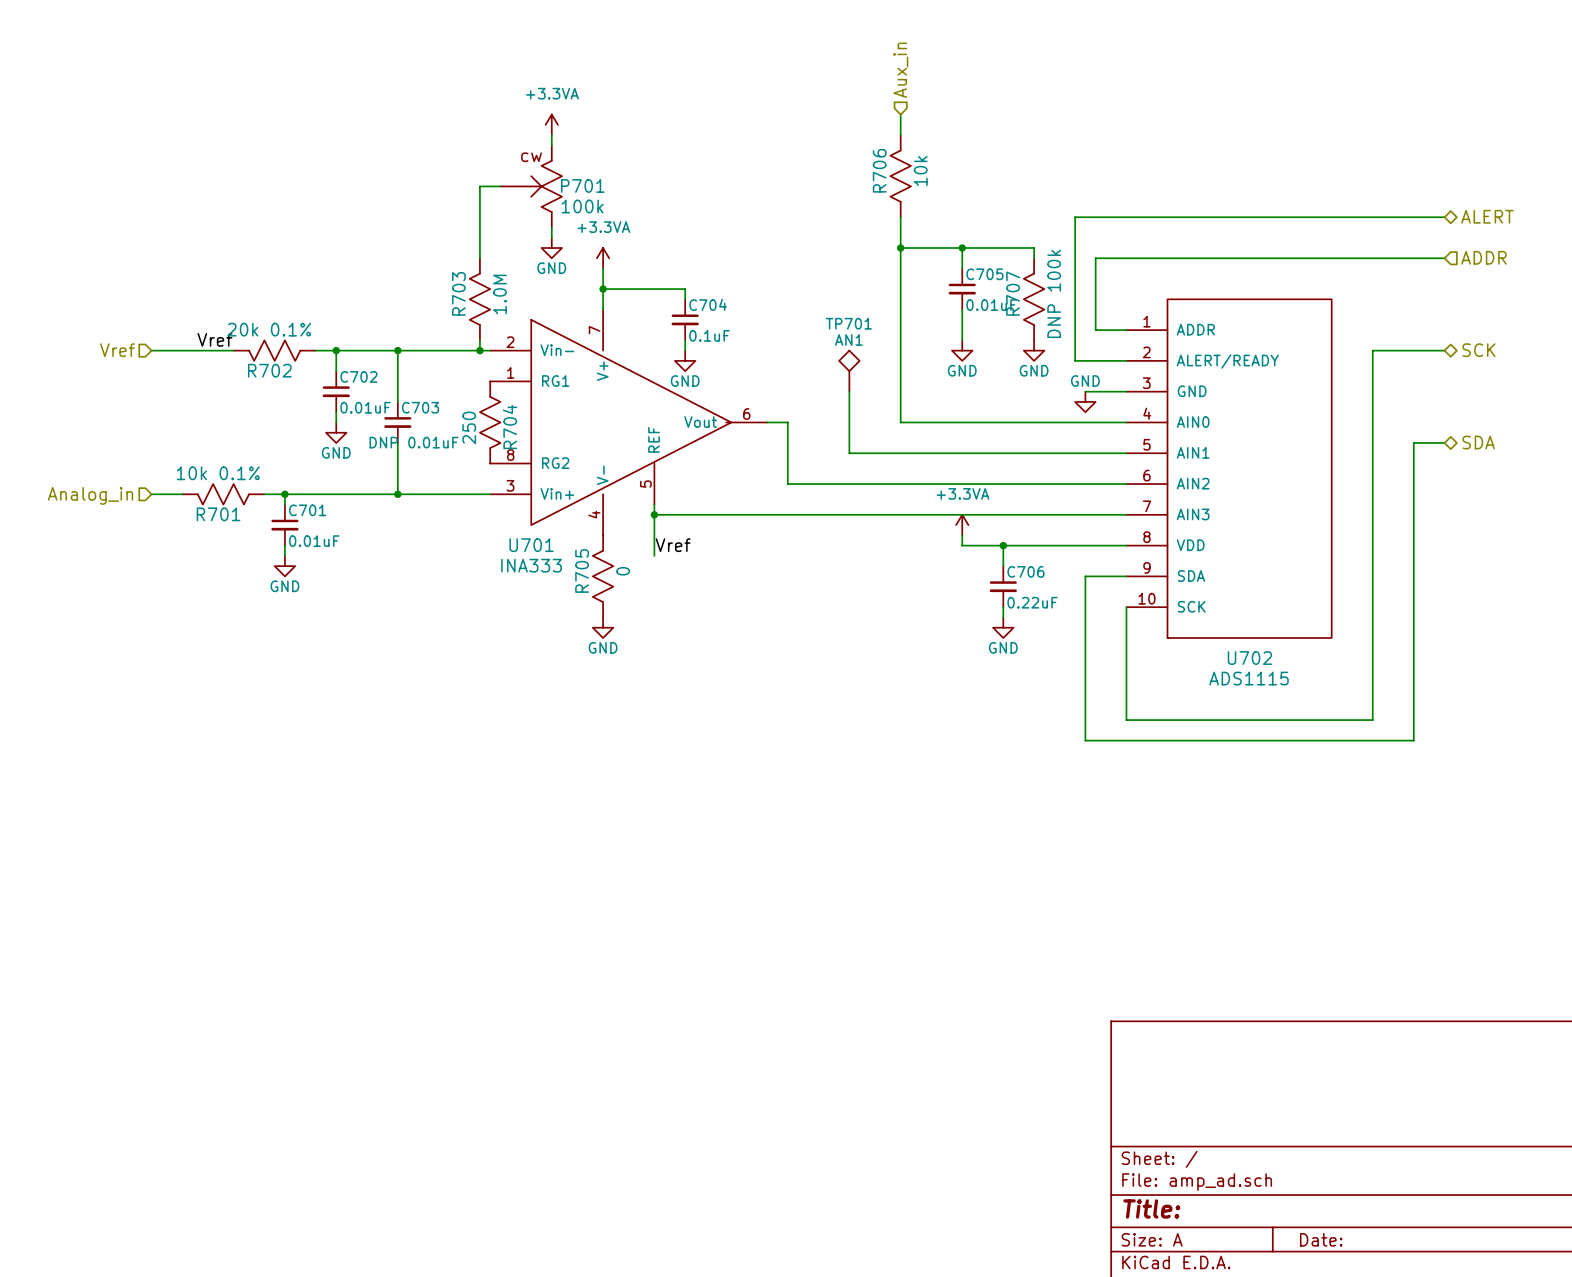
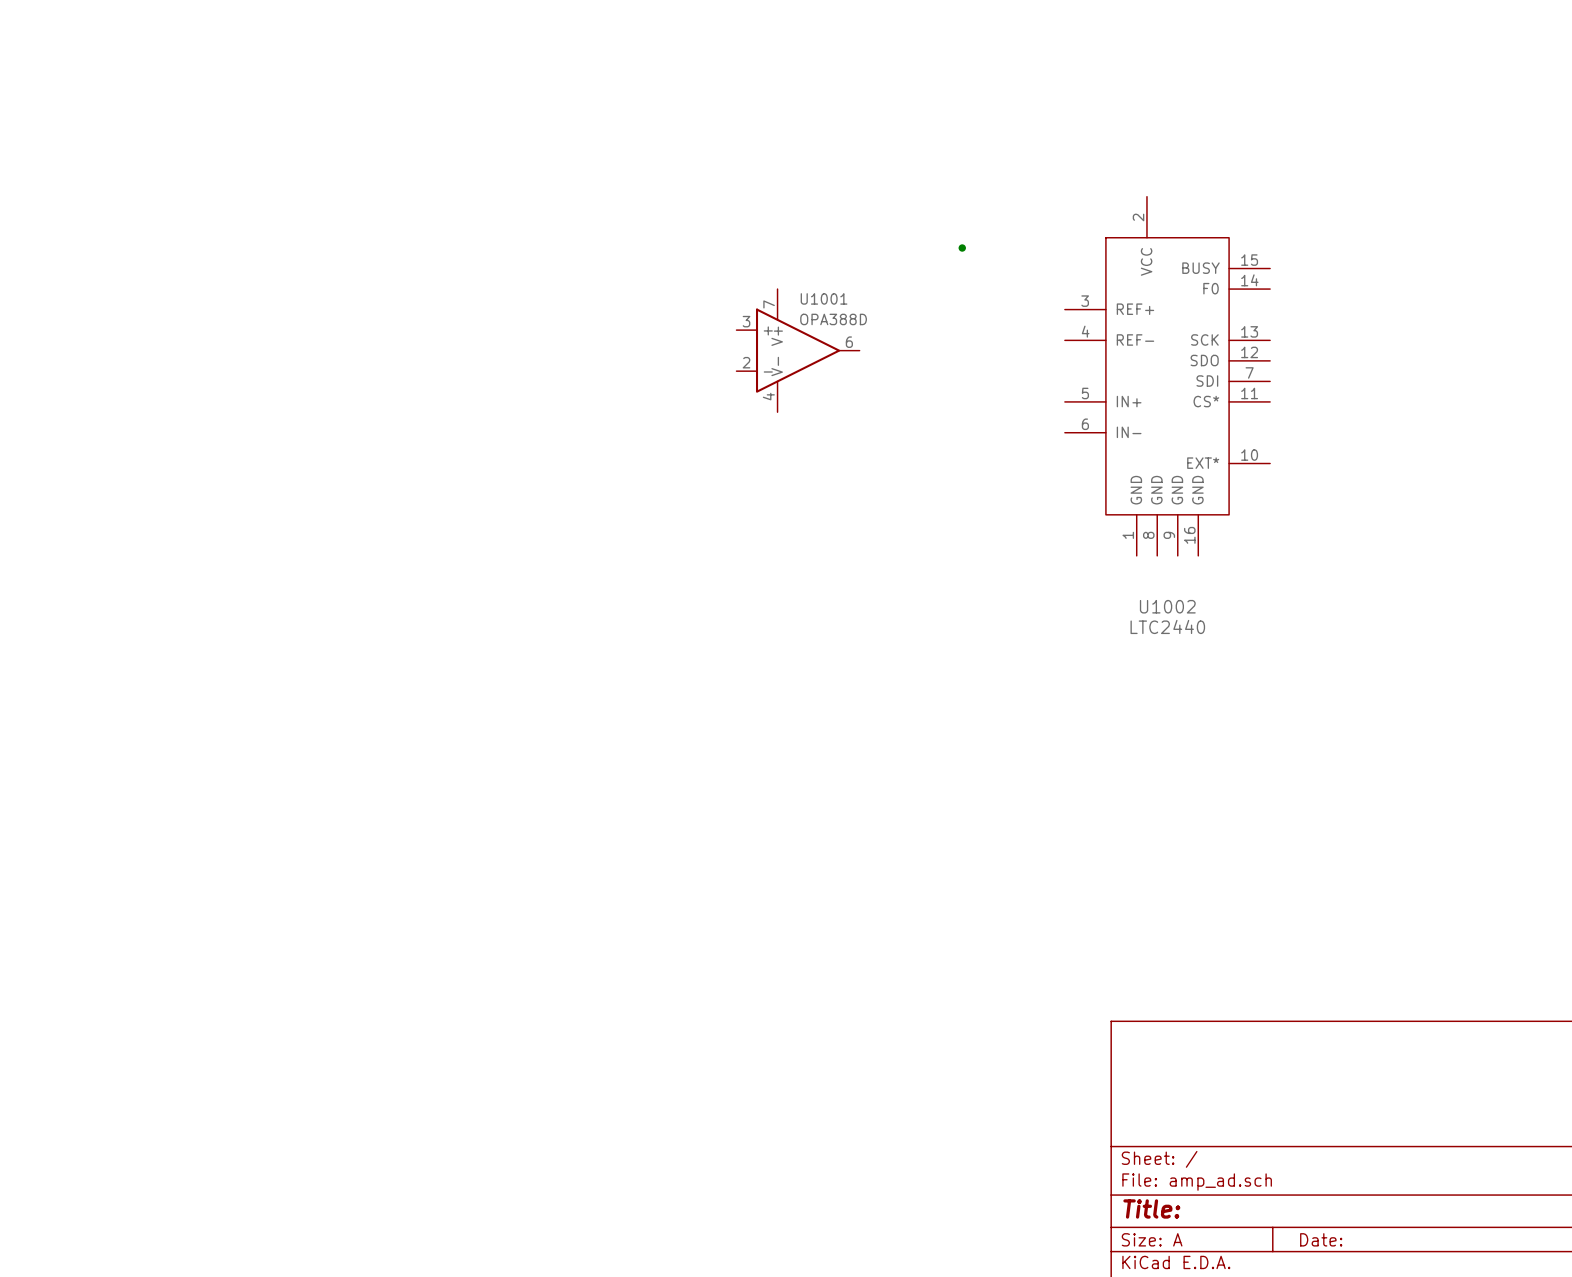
hierarchical label: Aux_in (900, 70) -> none
wire: (900, 114) (900, 135) -> none
power symbol: +3.3VA (551, 124) -> none
wire: (551, 135) (551, 145) -> none
R706: 10k (900, 176) -> none
wire: (500, 186) (479, 186) (479, 258) -> none
P701: 100k (531, 186) -> none
hierarchical label: ALERT (1487, 216) -> none
wire: (900, 217) (900, 422) (1126, 422) -> none
wire: (1444, 217) (1075, 217) (1075, 360) (1126, 360) -> none
wire: (551, 227) (551, 237) -> none
power symbol: GND (551, 248) -> none
wire: (900, 248) (1034, 248) (1034, 258) -> none
junction: (900, 248) -> none
wire: (962, 248) (962, 268) -> none
hierarchical label: ADDR (1483, 257) -> none
power symbol: +3.3VA (603, 258) -> none
wire: (1444, 258) (1095, 258) (1095, 330) (1126, 330) -> none
wire: (603, 268) (603, 309) -> none
wire: (603, 289) (685, 289) (685, 299) -> none
junction: (603, 289) -> none
C705: 0.01uF (962, 289) -> none
R703: 1.0M (479, 299) -> none
R707: DNP 100k (1034, 299) -> none
wire: (962, 309) (962, 340) -> none
C704: 0.1uF (685, 319) -> none
label: Vref (214, 339) -> none
wire: (479, 340) (479, 350) -> none
wire: (685, 340) (685, 350) -> none
hierarchical label: Vref (117, 350) -> none
wire: (151, 350) (233, 350) -> none
R702: 20k 0.1% (274, 350) -> none
wire: (315, 350) (490, 350) -> none
wire: (336, 350) (336, 371) -> none
junction: (336, 350) -> none
wire: (397, 350) (397, 401) -> none
junction: (397, 350) -> none
junction: (479, 350) -> none
U1001: none -> OPA388D (798, 350)
power symbol: GND (962, 350) -> none
power symbol: GND (1034, 350) -> none
wire: (1444, 350) (1372, 350) (1372, 720) (1126, 720) (1126, 607) -> none
hierarchical label: SCK (1478, 350) -> none
power symbol: GND (685, 360) -> none
TP701: AN1 (849, 371) -> none
U1002: none -> LTC2440 (1167, 376)
C702: 0.01uF (336, 391) -> none
wire: (849, 391) (849, 453) (1126, 453) -> none
wire: (1085, 391) (1126, 391) -> none
power symbol: GND (1085, 401) -> none
wire: (336, 412) (336, 422) -> none
C703: DNP 0.01uF (397, 422) -> none
R704: 250 (490, 422) -> none
U701: INA333 (628, 422) -> none
wire: (767, 422) (787, 422) (787, 484) (1126, 484) -> none
power symbol: GND (336, 432) -> none
wire: (397, 442) (397, 494) -> none
wire: (1444, 442) (1413, 442) (1413, 740) (1085, 740) (1085, 576) (1126, 576) -> none
hierarchical label: SDA (1478, 442) -> none
U702: ADS1115 (1229, 468) -> none
wire: (151, 494) (182, 494) -> none
R701: 10k 0.1% (223, 494) -> none
wire: (264, 494) (490, 494) -> none
wire: (284, 494) (284, 504) -> none
junction: (284, 494) -> none
junction: (397, 494) -> none
hierarchical label: Analog_in (90, 495) -> none
wire: (654, 504) (654, 555) -> none
wire: (654, 514) (1126, 514) -> none
junction: (654, 514) -> none
C701: 0.01uF (284, 525) -> none
power symbol: +3.3VA (962, 525) -> none
wire: (962, 535) (962, 545) (1126, 545) -> none
wire: (284, 545) (284, 555) -> none
label: Vref (673, 545) -> none
wire: (1003, 545) (1003, 566) -> none
junction: (1003, 545) -> none
power symbol: GND (284, 566) -> none
R705: 0 (603, 576) -> none
C706: 0.22uF (1003, 586) -> none
wire: (1003, 607) (1003, 617) -> none
power symbol: GND (603, 627) -> none
power symbol: GND (1003, 627) -> none

